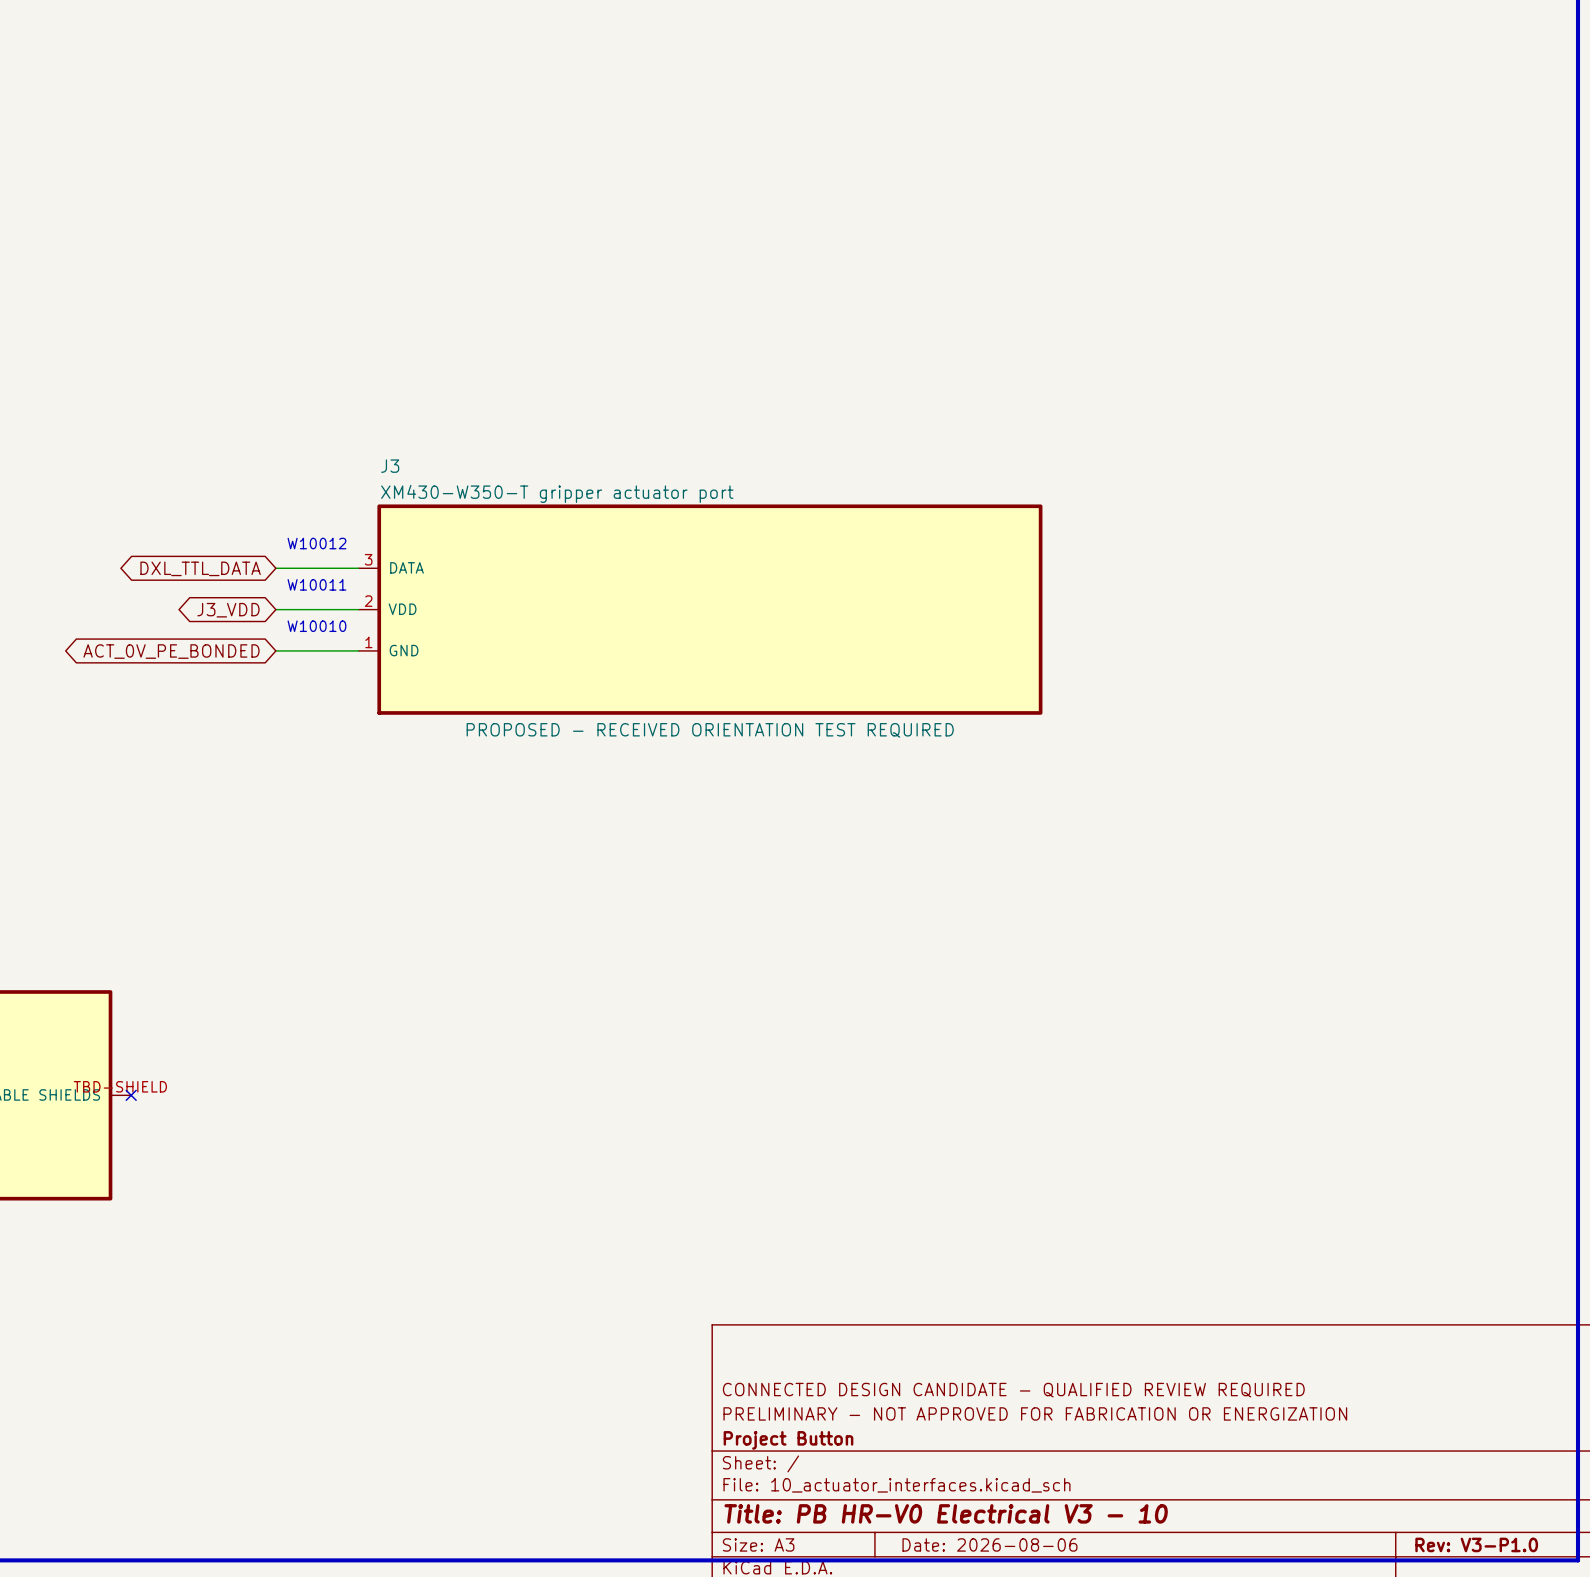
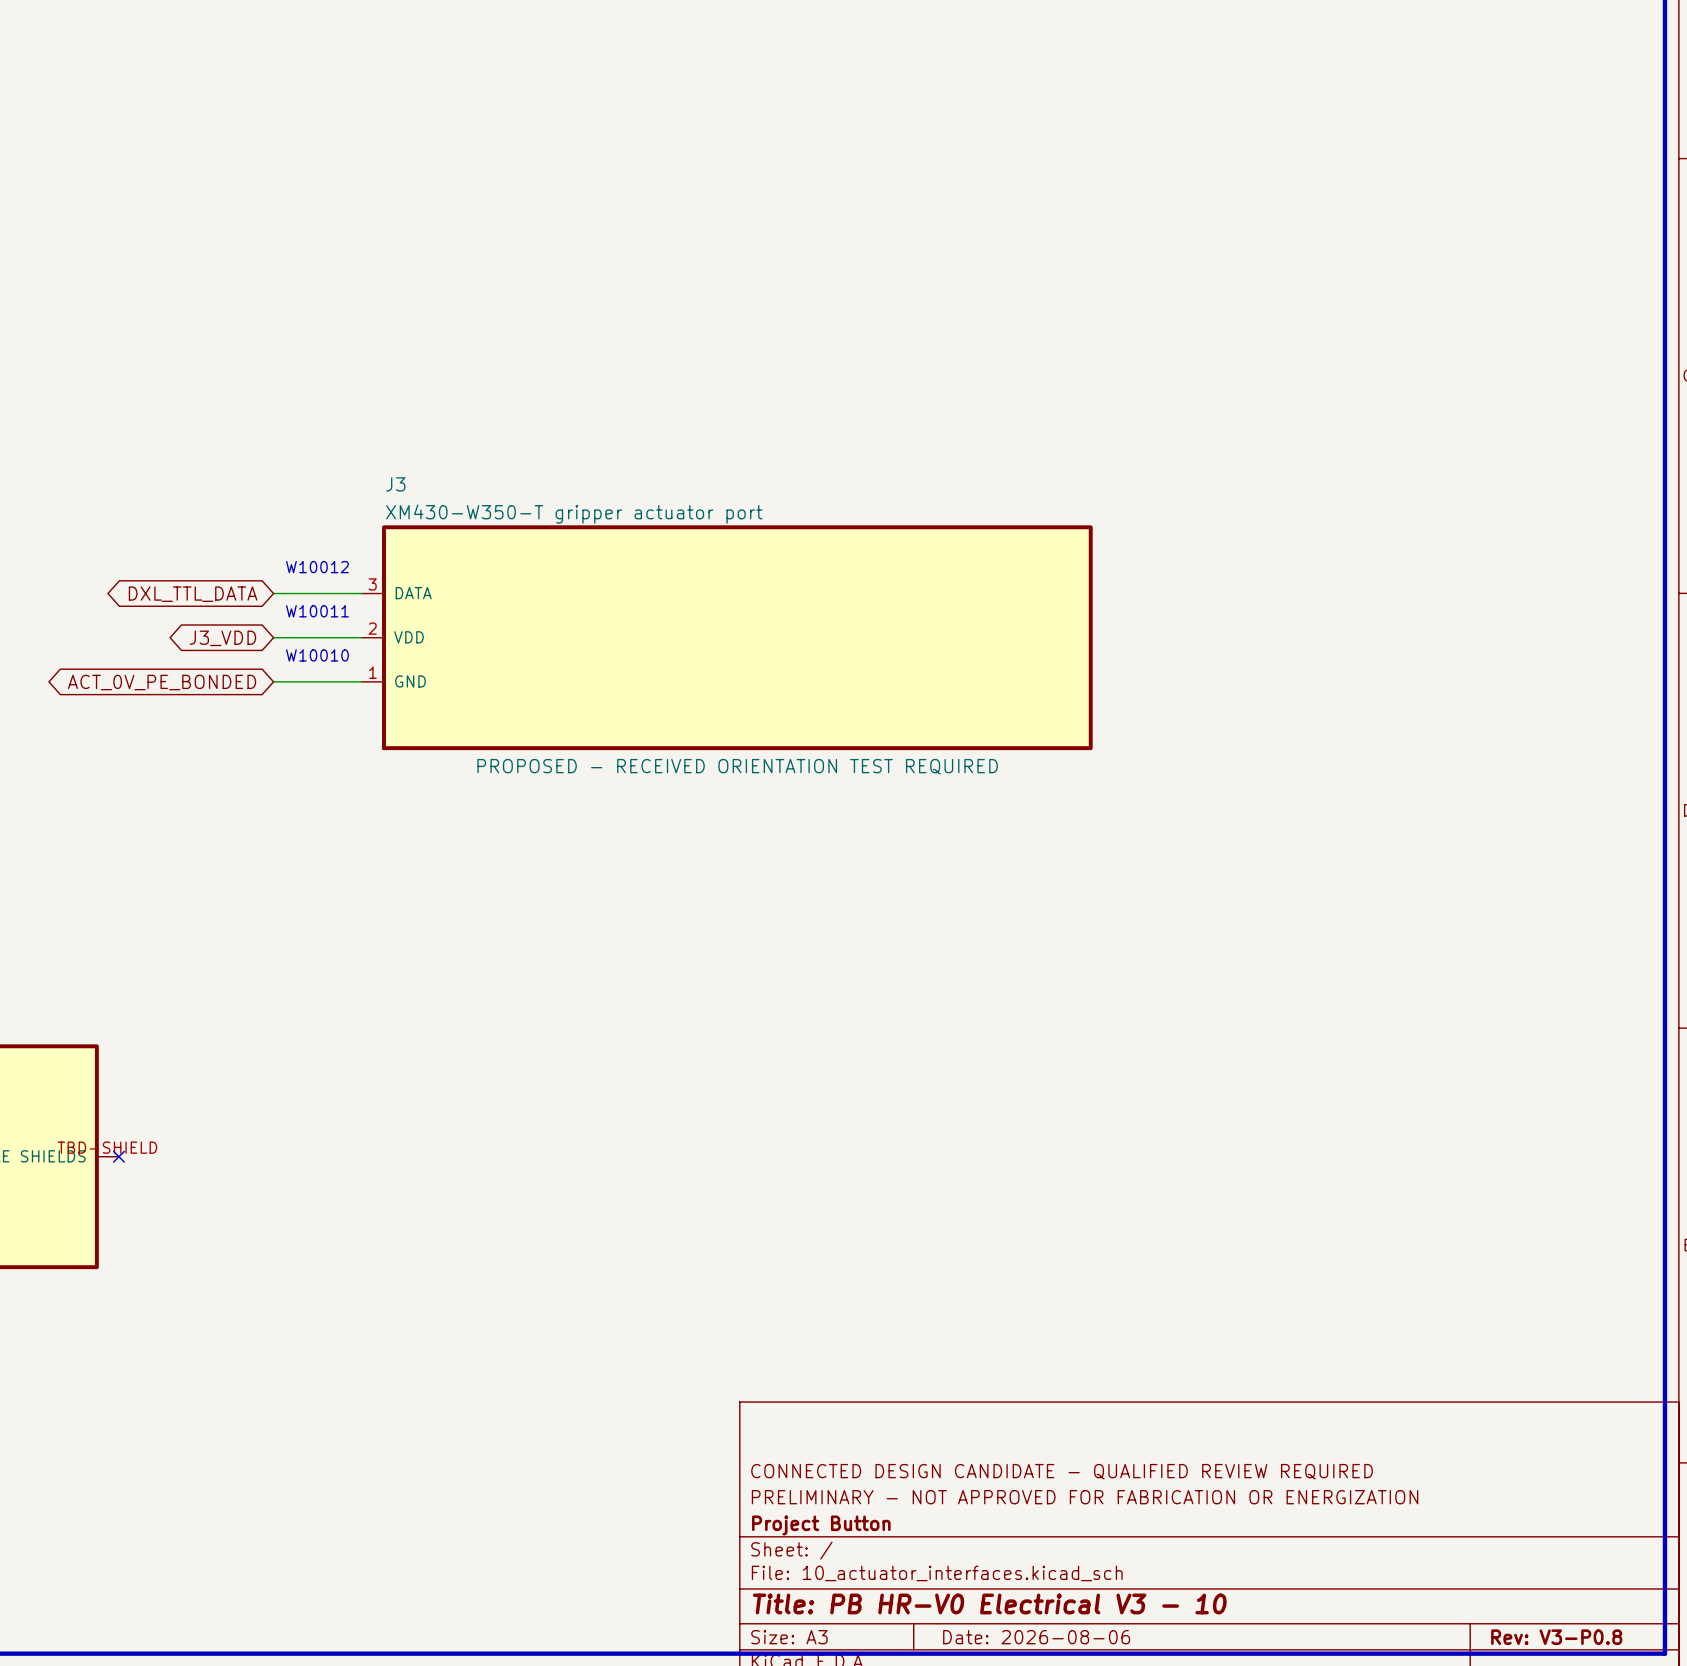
title block: Rev: V3-P1.0 (1476, 1544) -> Rev: V3-P0.8 (1556, 1637)

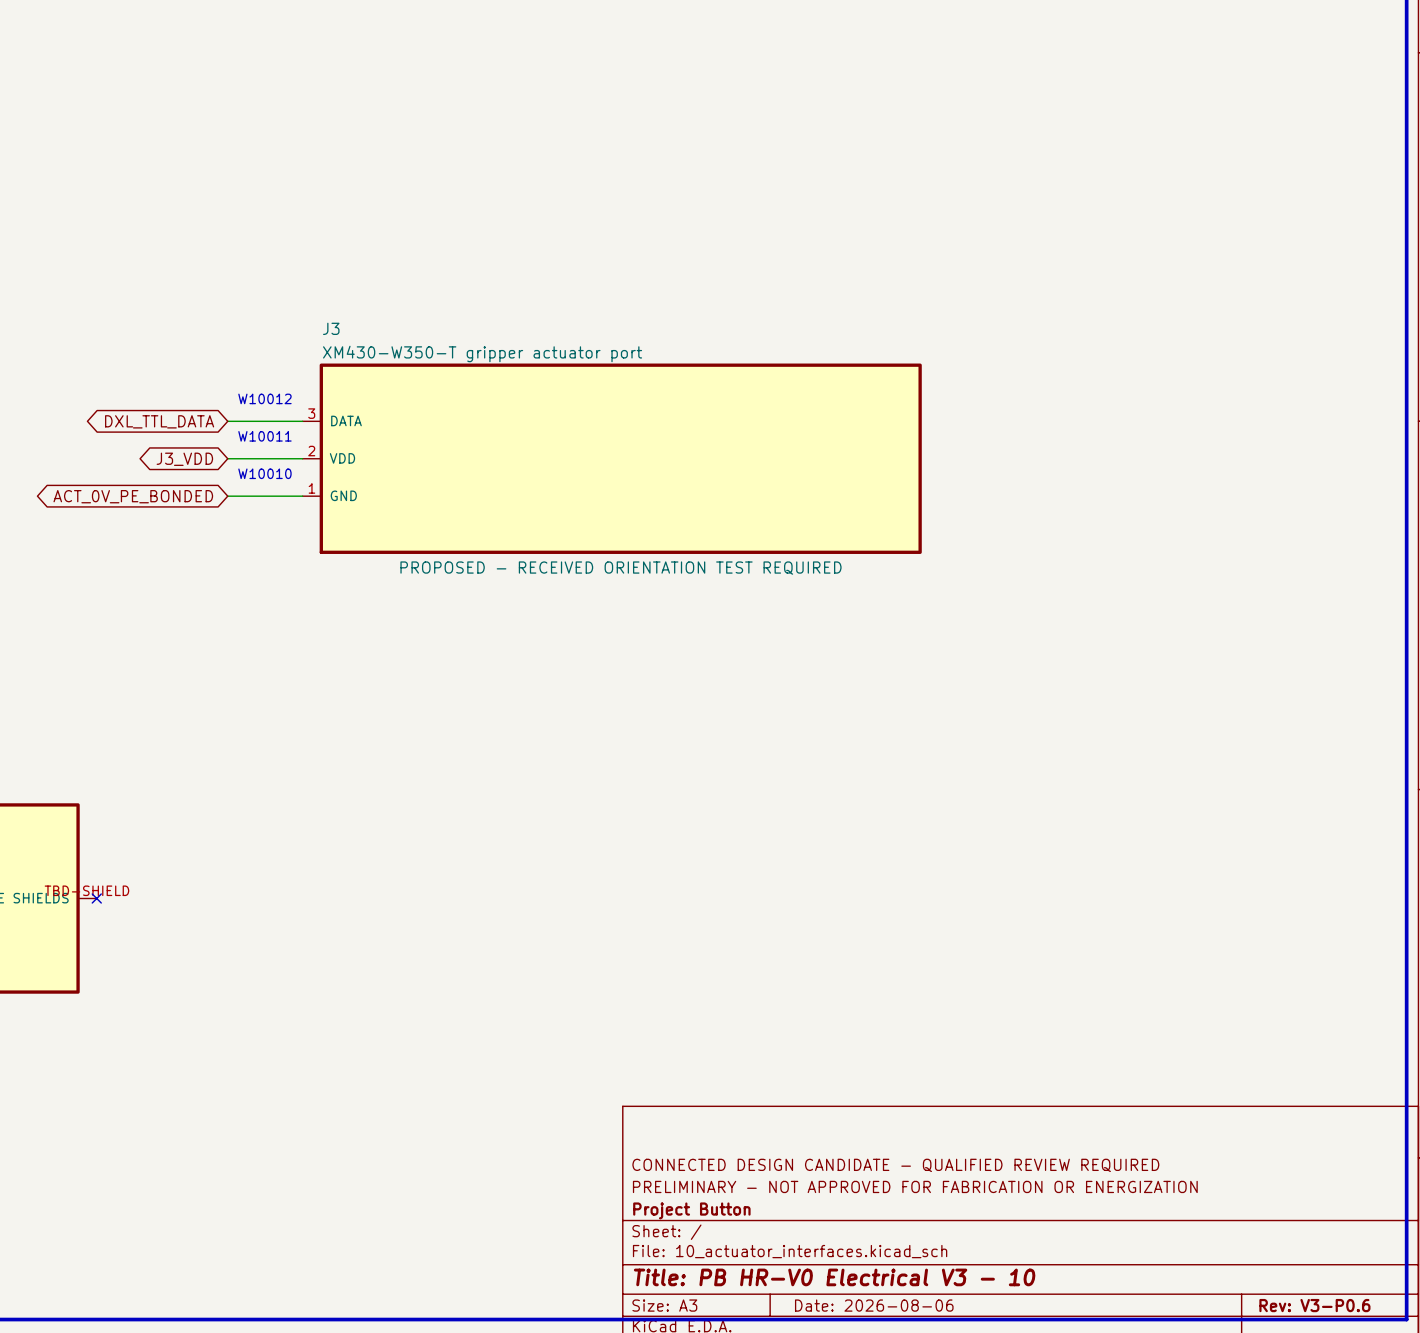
title block: Rev: V3-P0.8 (1556, 1637) -> Rev: V3-P0.6 (1314, 1305)

